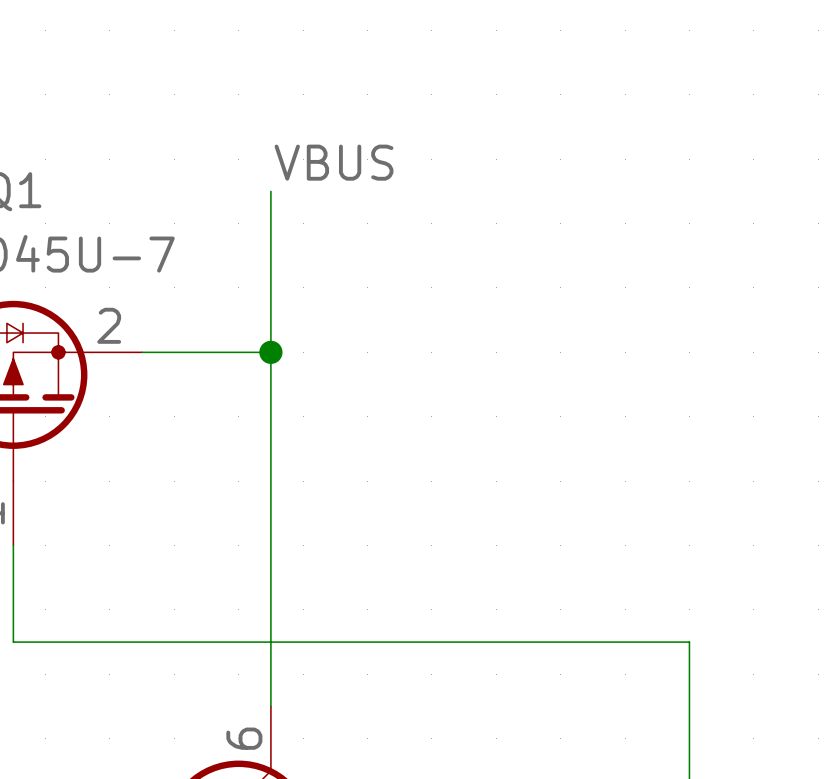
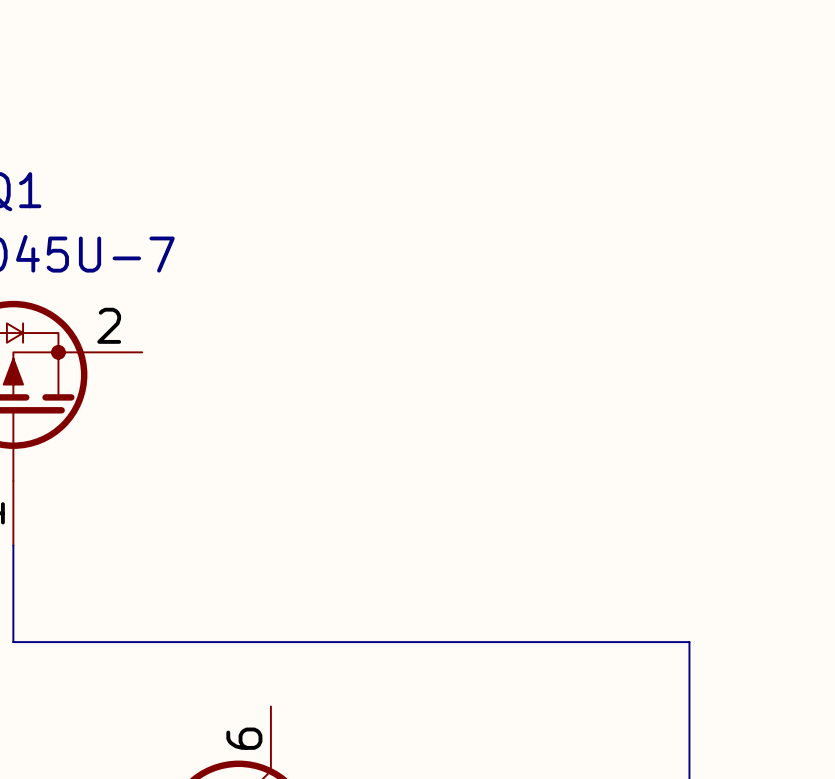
label: VBUS (334, 162) -> none
wire: (270, 191) (270, 706) -> none
wire: (142, 352) (270, 352) -> none
junction: (270, 352) -> none

